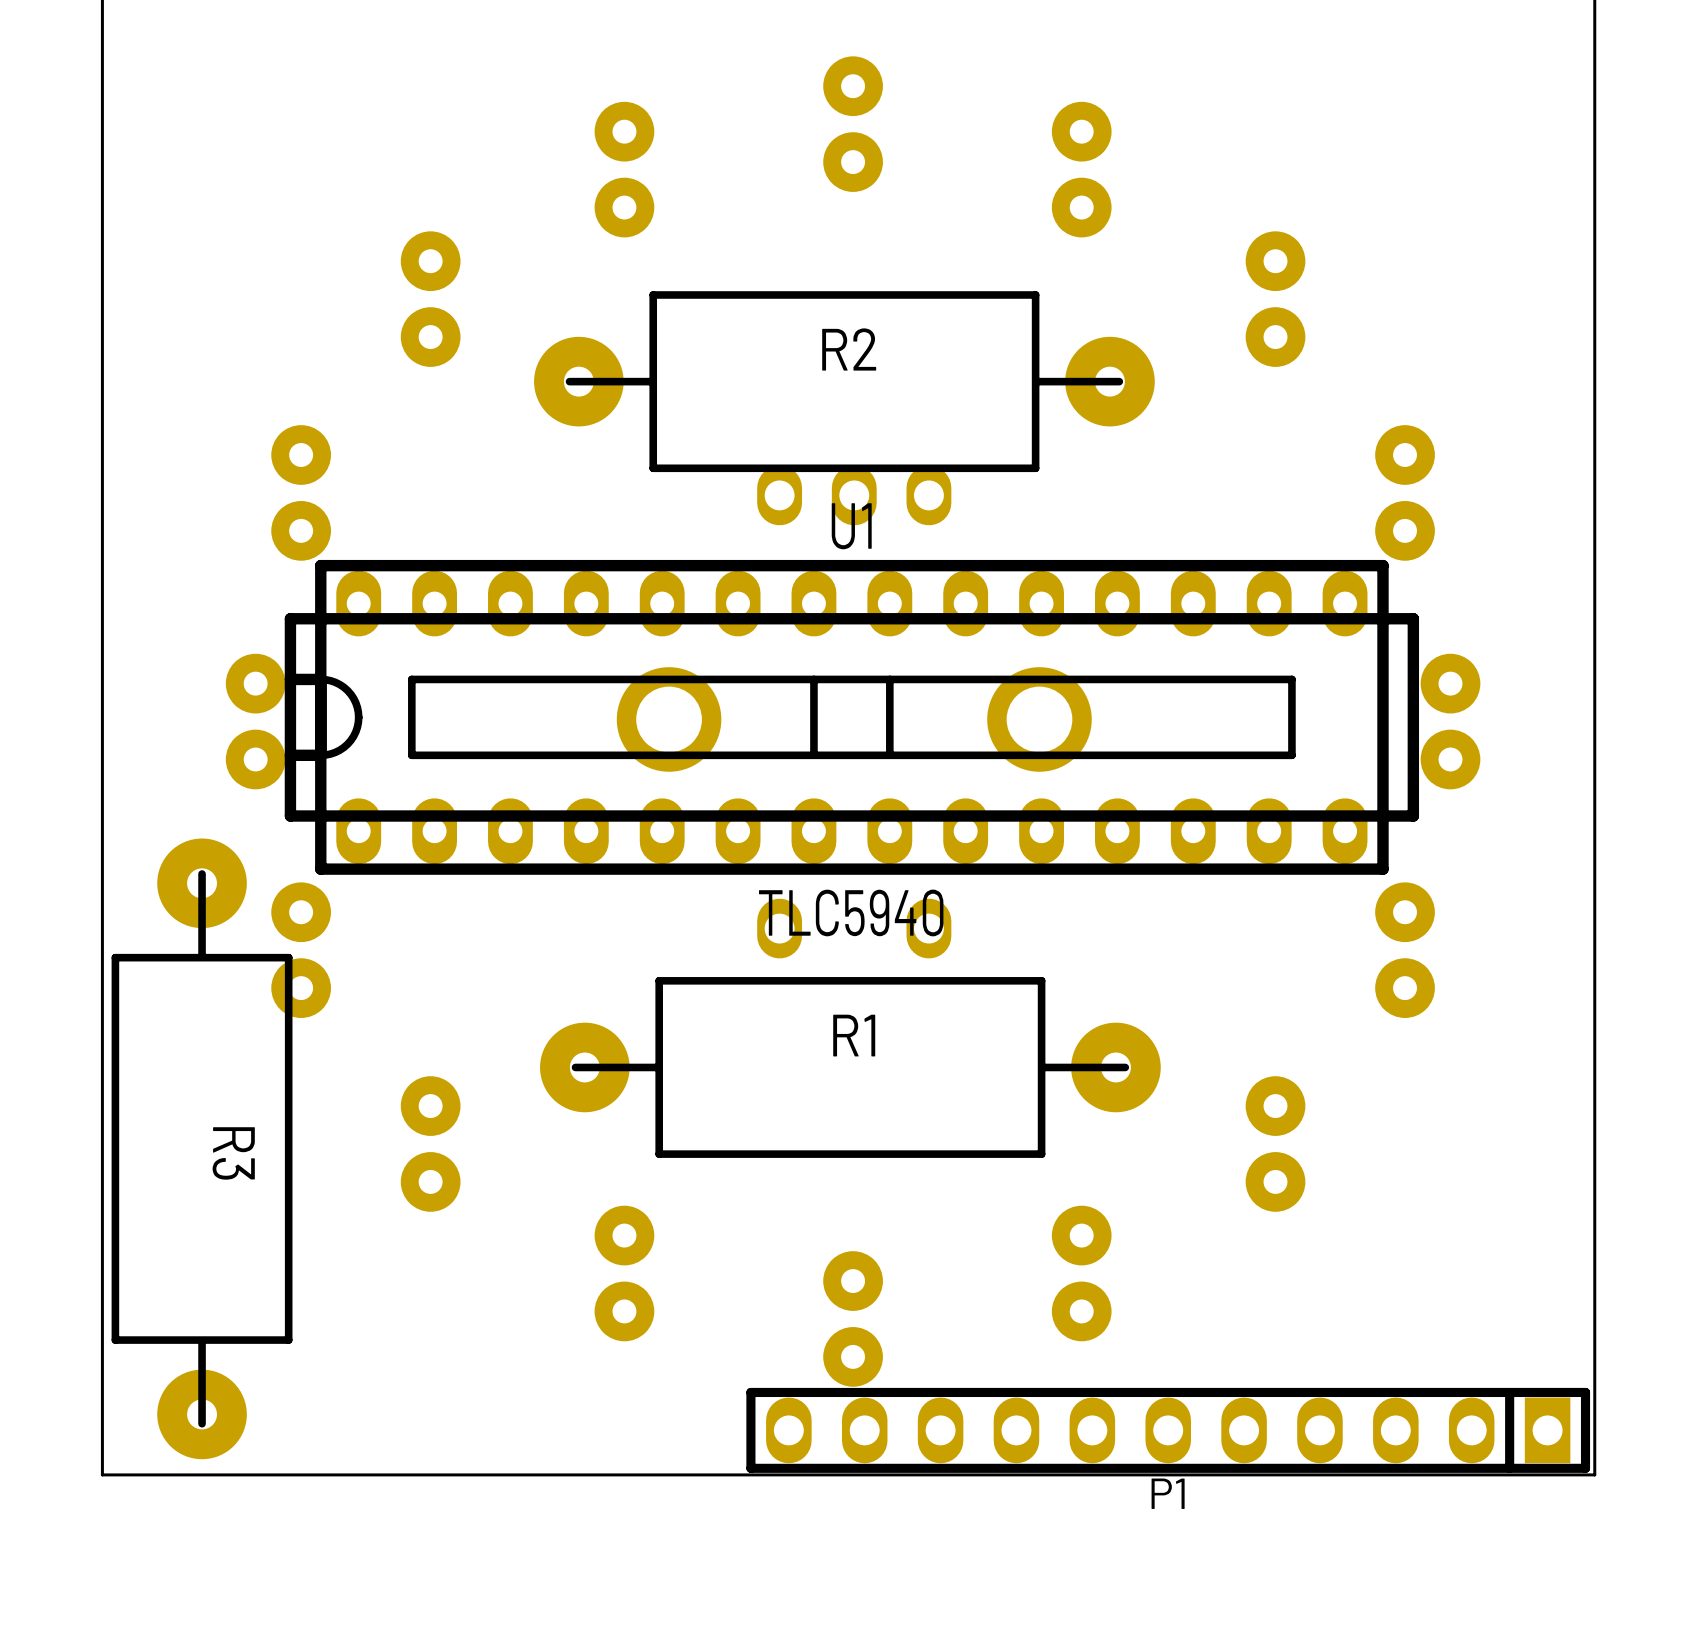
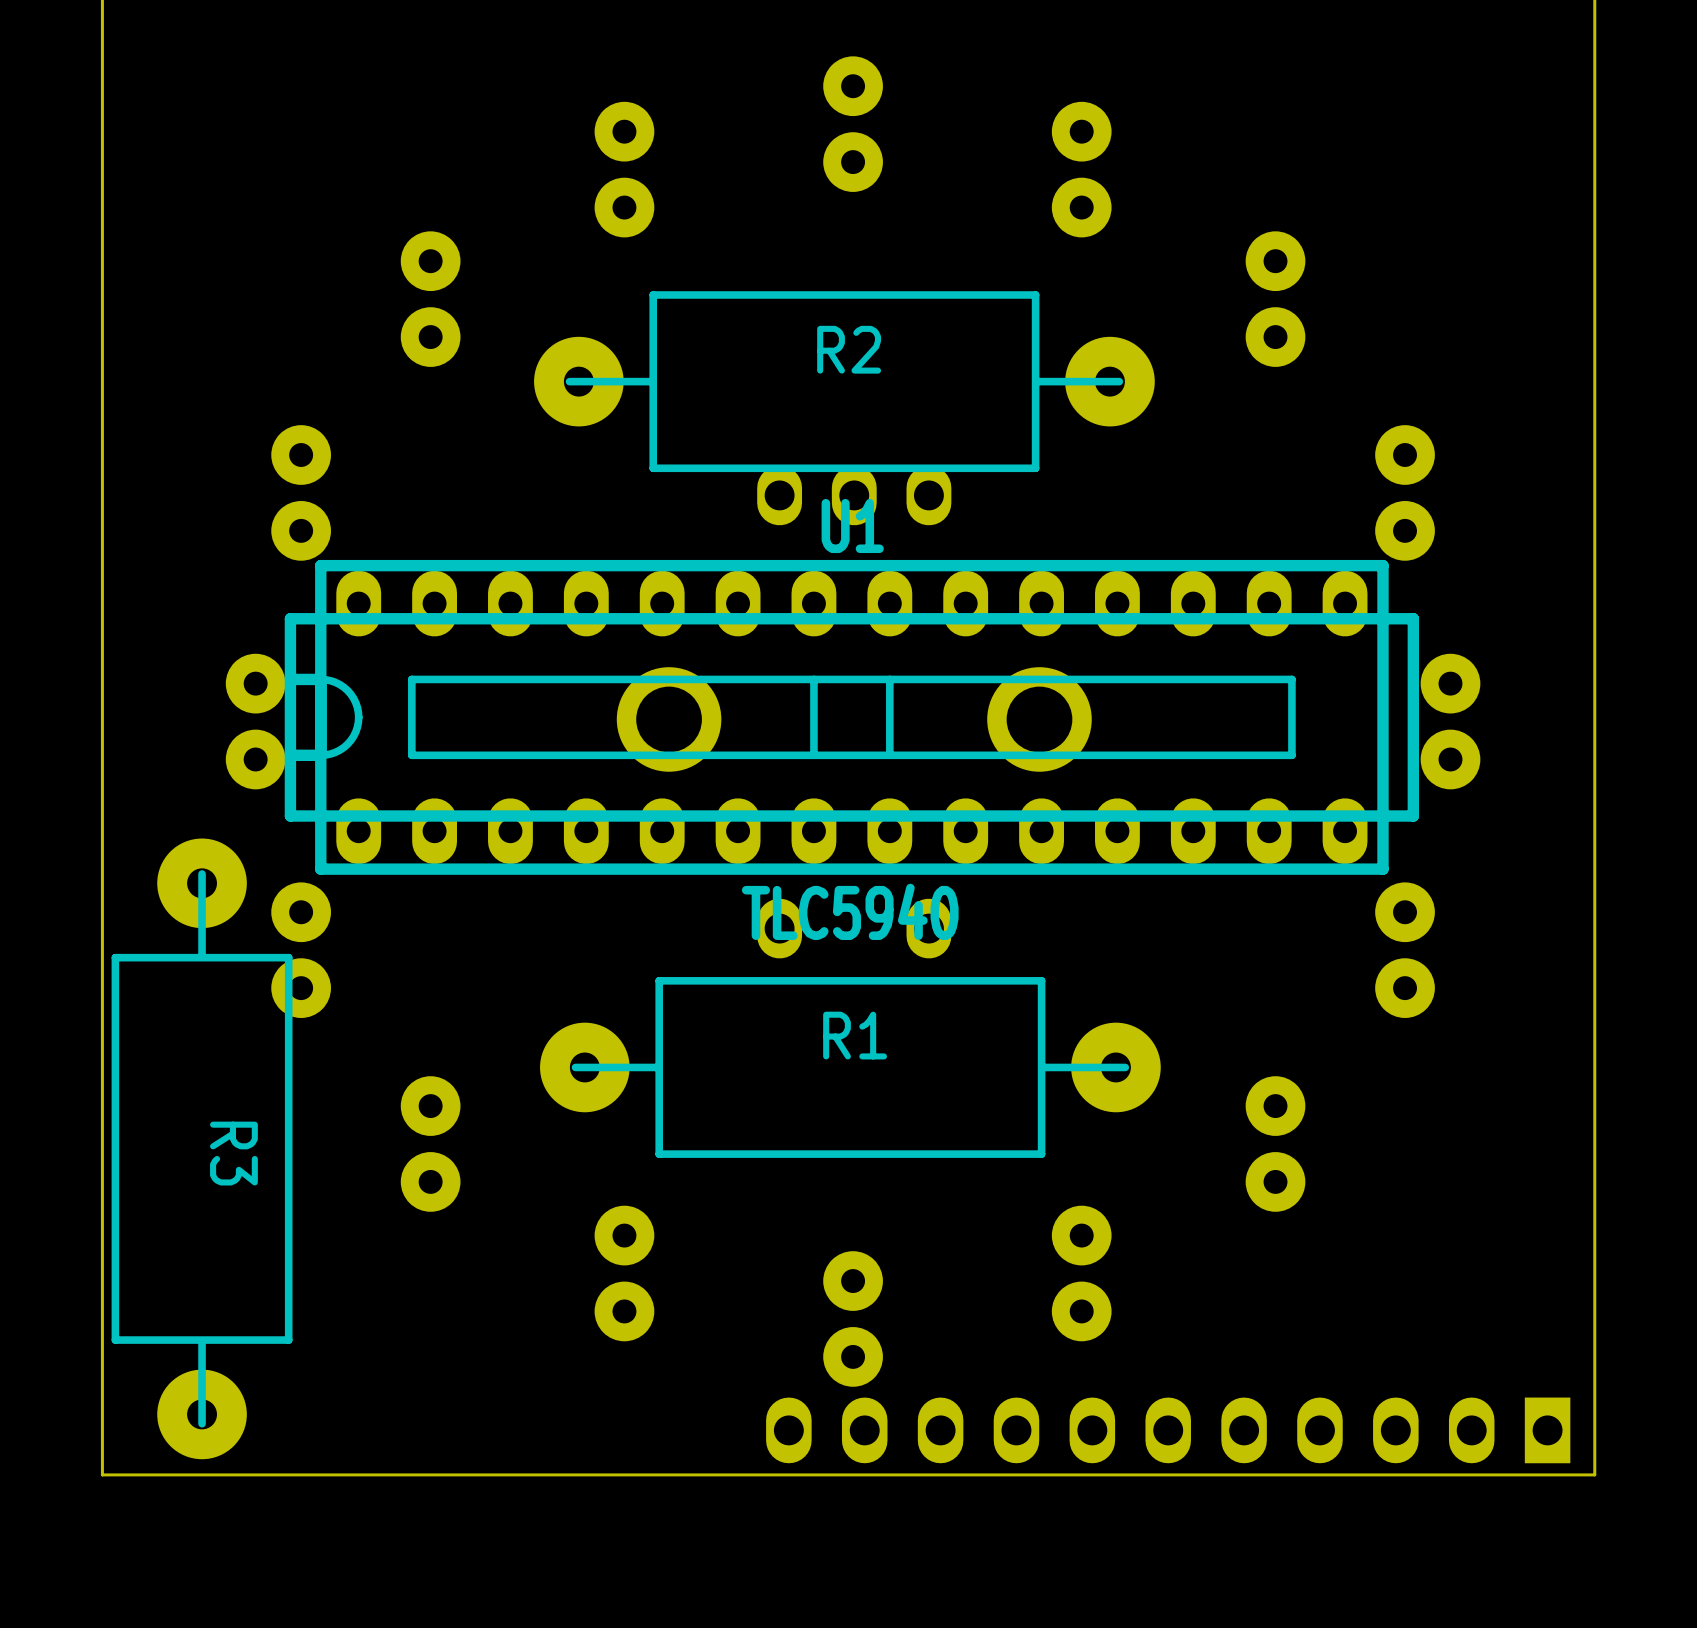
P1 side: bottom (1168, 1430) -> top (1168, 1430)

